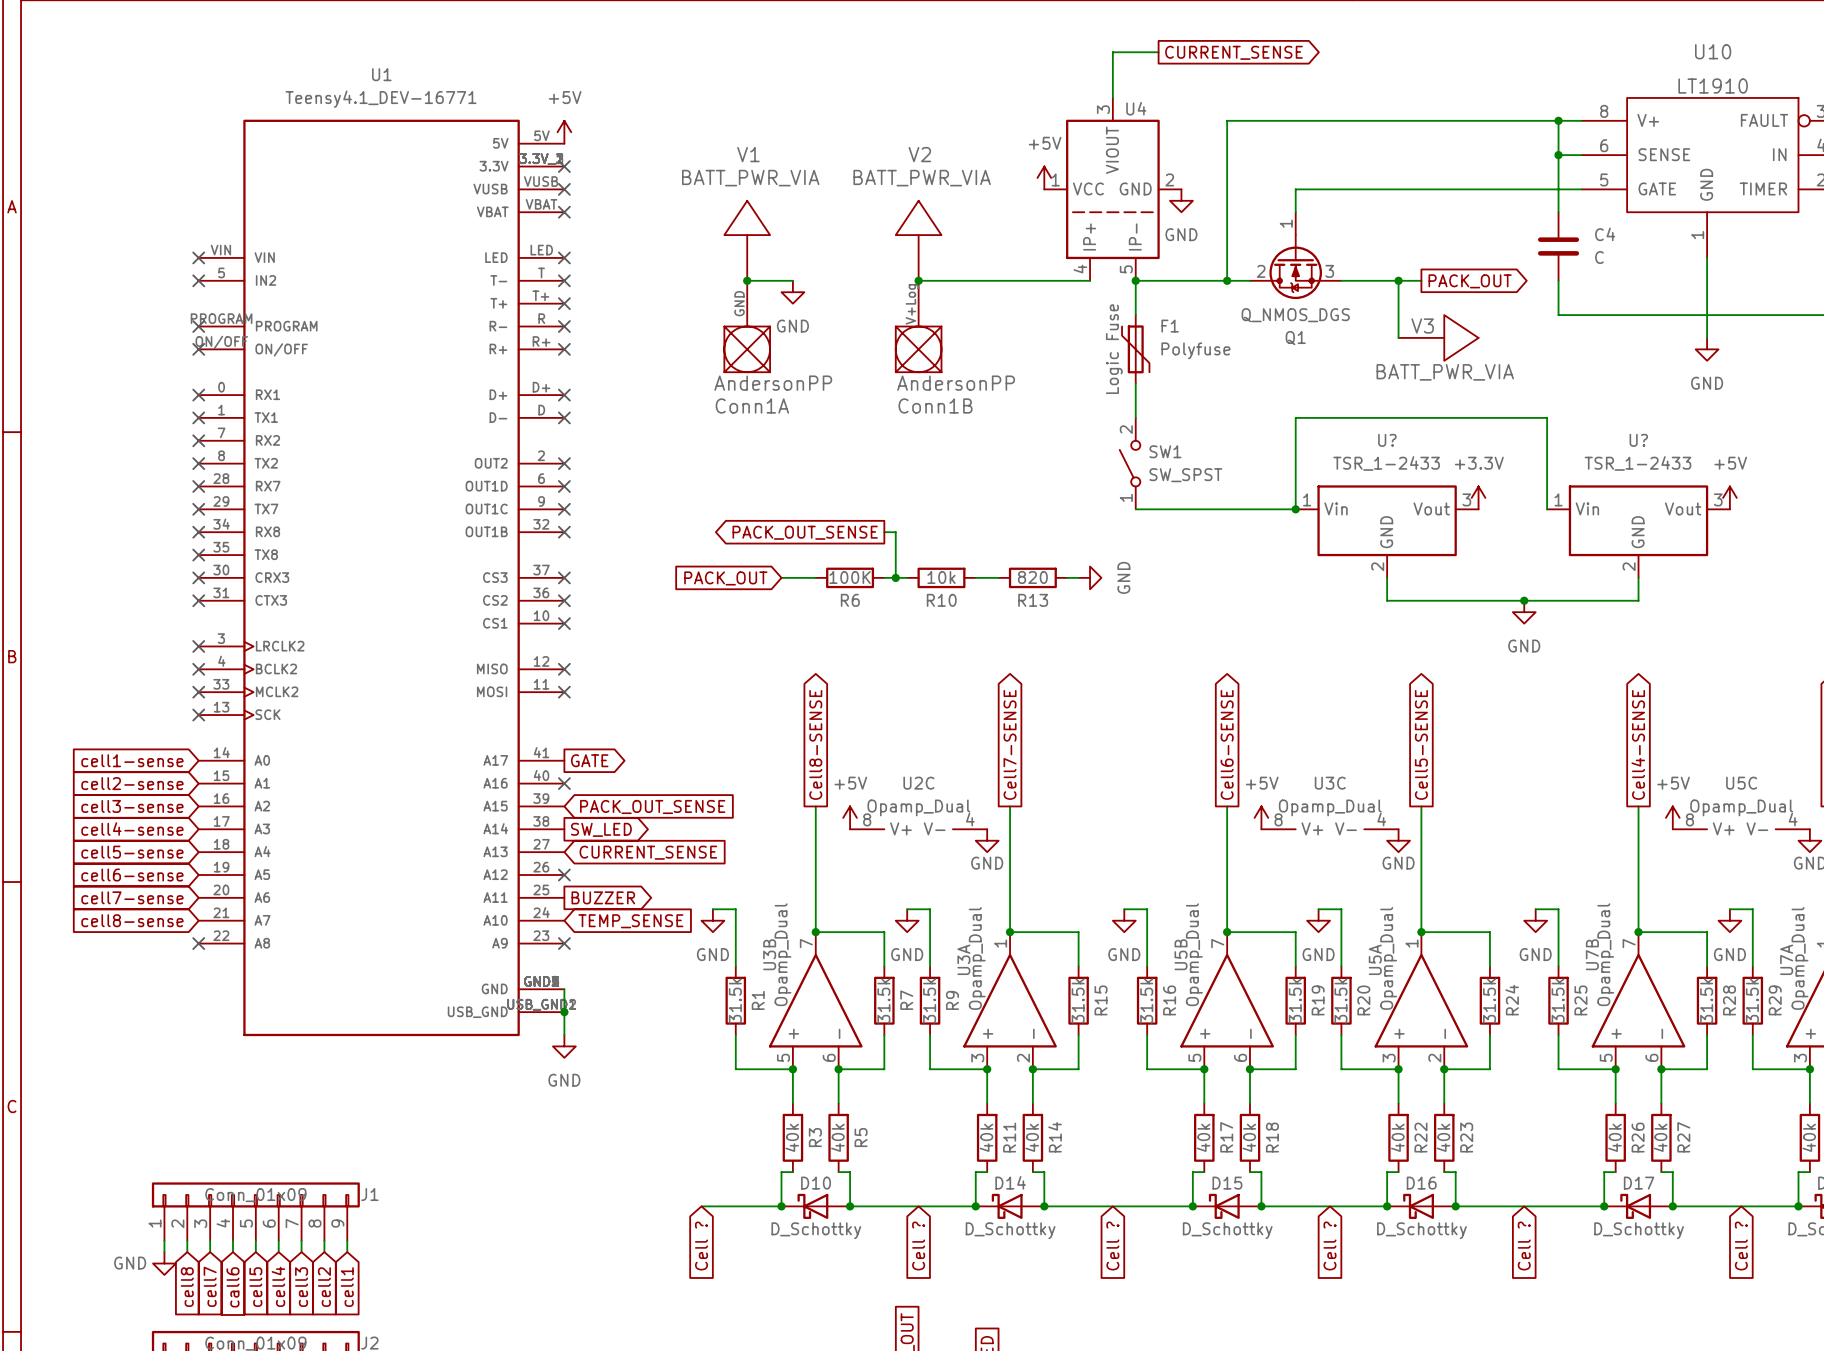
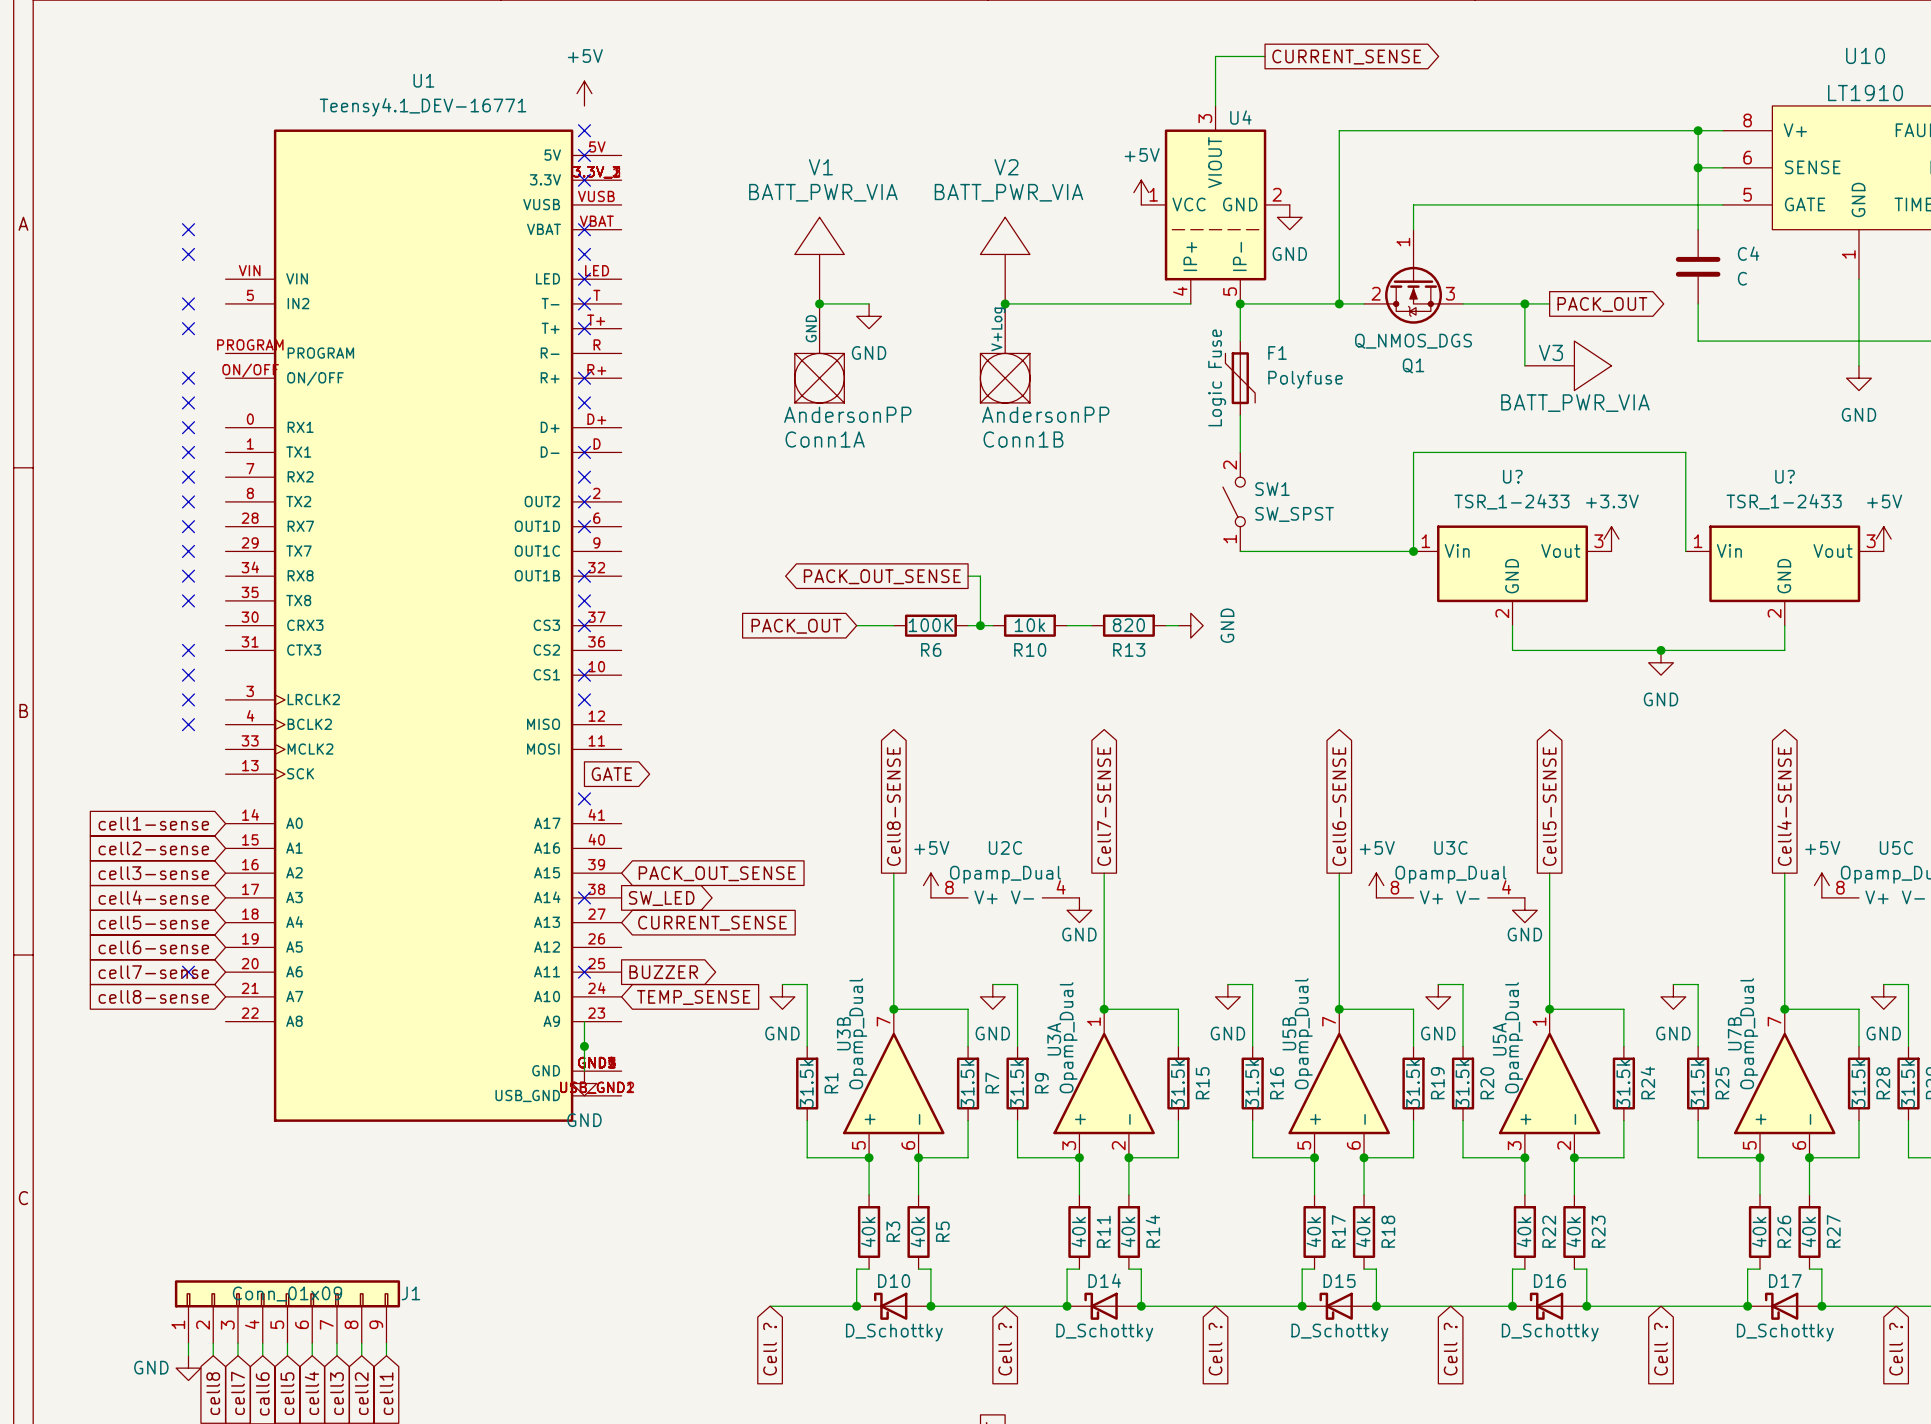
no-connect mark: none -> (584, 130)
power symbol position: +5V (564, 132) -> +5V (584, 93)
no-connect mark: none -> (584, 155)
no-connect mark: none -> (584, 180)
no-connect mark: (564, 166) -> none
no-connect mark: (564, 189) -> none
no-connect mark: none -> (188, 229)
no-connect mark: none -> (584, 229)
no-connect mark: (564, 212) -> none
no-connect mark: none -> (188, 254)
no-connect mark: none -> (584, 254)
no-connect mark: (198, 257) -> none
no-connect mark: none -> (584, 279)
no-connect mark: (564, 257) -> none
no-connect mark: none -> (188, 303)
no-connect mark: (198, 280) -> none
no-connect mark: none -> (584, 303)
no-connect mark: (564, 280) -> none
no-connect mark: none -> (188, 328)
no-connect mark: none -> (584, 328)
no-connect mark: (564, 303) -> none
no-connect mark: (198, 326) -> none
no-connect mark: (564, 326) -> none
no-connect mark: none -> (188, 378)
no-connect mark: (198, 349) -> none
no-connect mark: none -> (584, 378)
no-connect mark: (564, 349) -> none
no-connect mark: none -> (188, 402)
no-connect mark: none -> (584, 402)
no-connect mark: none -> (188, 427)
no-connect mark: (198, 395) -> none
no-connect mark: (564, 395) -> none
no-connect mark: none -> (188, 452)
no-connect mark: (198, 417) -> none
no-connect mark: none -> (584, 452)
no-connect mark: (564, 417) -> none
no-connect mark: none -> (188, 477)
no-connect mark: (198, 440) -> none
no-connect mark: none -> (584, 477)
no-connect mark: none -> (188, 501)
no-connect mark: (198, 463) -> none
no-connect mark: none -> (584, 501)
no-connect mark: (564, 463) -> none
no-connect mark: none -> (188, 526)
no-connect mark: (198, 486) -> none
no-connect mark: none -> (584, 526)
no-connect mark: (564, 486) -> none
no-connect mark: none -> (188, 551)
no-connect mark: (198, 509) -> none
no-connect mark: (564, 509) -> none
no-connect mark: none -> (188, 576)
no-connect mark: (198, 532) -> none
no-connect mark: none -> (584, 576)
no-connect mark: (564, 532) -> none
no-connect mark: none -> (188, 600)
no-connect mark: (198, 555) -> none
no-connect mark: none -> (584, 600)
no-connect mark: (198, 577) -> none
no-connect mark: none -> (584, 625)
no-connect mark: (564, 577) -> none
no-connect mark: none -> (188, 650)
no-connect mark: (198, 600) -> none
no-connect mark: (564, 600) -> none
no-connect mark: none -> (188, 675)
no-connect mark: none -> (584, 675)
no-connect mark: (564, 623) -> none
no-connect mark: none -> (188, 699)
no-connect mark: (198, 646) -> none
no-connect mark: none -> (584, 699)
no-connect mark: none -> (188, 724)
no-connect mark: (198, 669) -> none
no-connect mark: (564, 669) -> none
no-connect mark: (198, 692) -> none
no-connect mark: (564, 692) -> none
no-connect mark: (198, 715) -> none
no-connect mark: none -> (584, 798)
global label position: GATE (589, 760) -> GATE (611, 774)
no-connect mark: (564, 783) -> none
no-connect mark: none -> (584, 897)
no-connect mark: (564, 875) -> none
no-connect mark: none -> (188, 972)
no-connect mark: none -> (584, 972)
no-connect mark: (198, 943) -> none
no-connect mark: (564, 943) -> none
junction: none -> (584, 1046)
wire: (564, 989) (564, 1034) -> (584, 1021) (584, 1071)
junction: (564, 1012) -> none
power symbol position: GND (564, 1046) -> GND (584, 1083)

